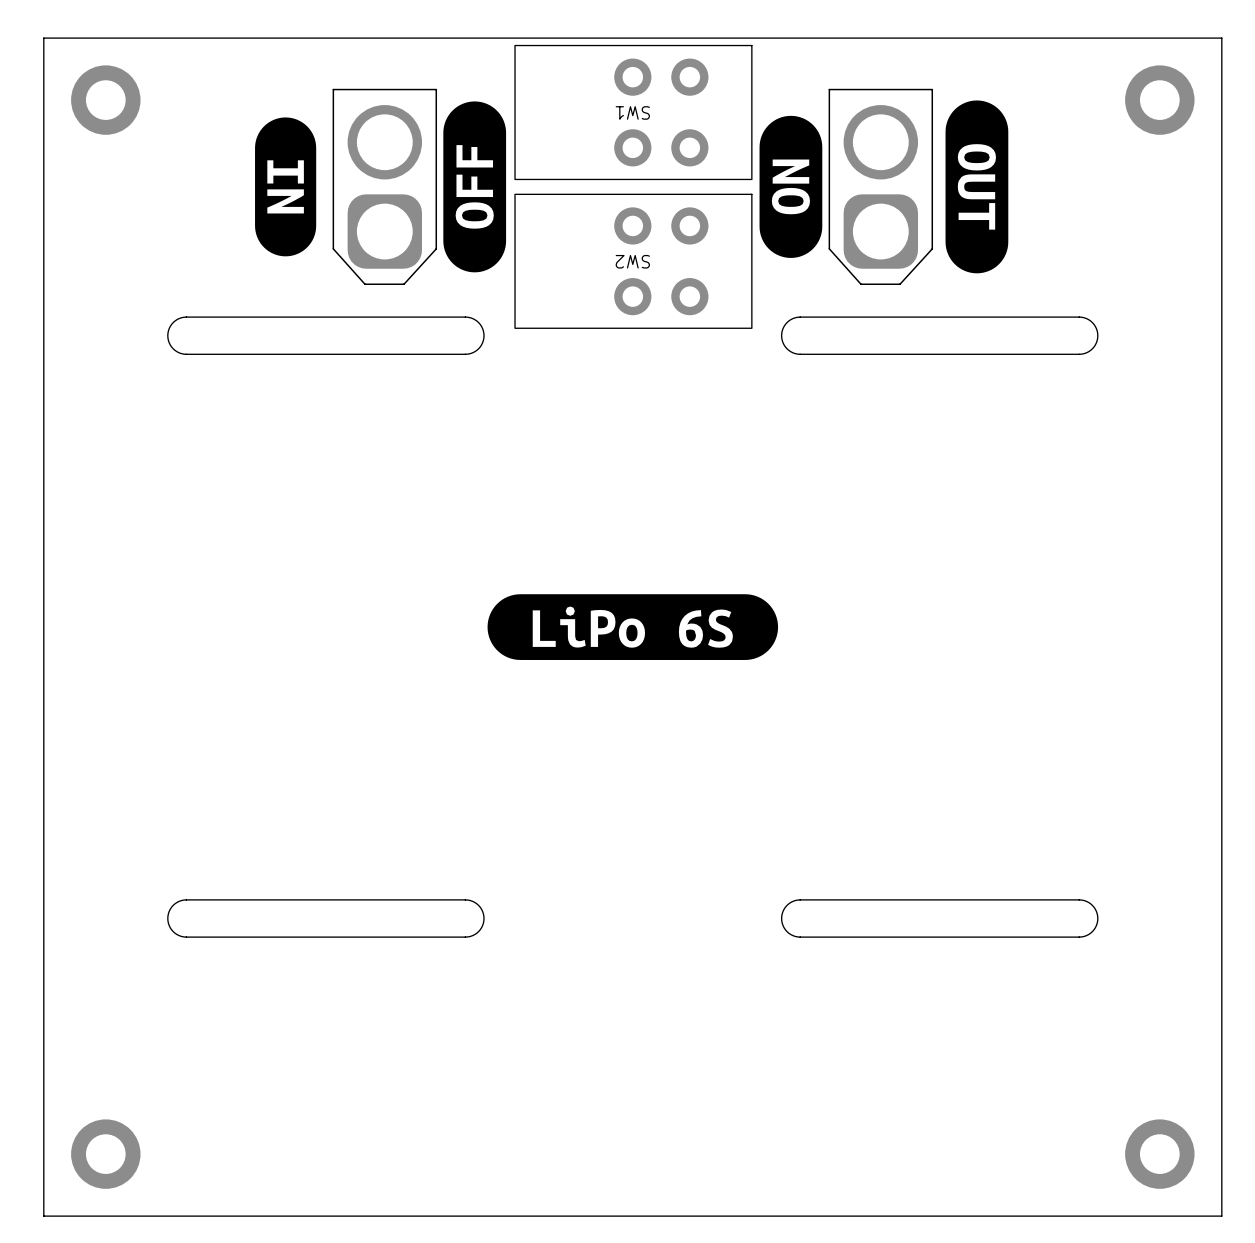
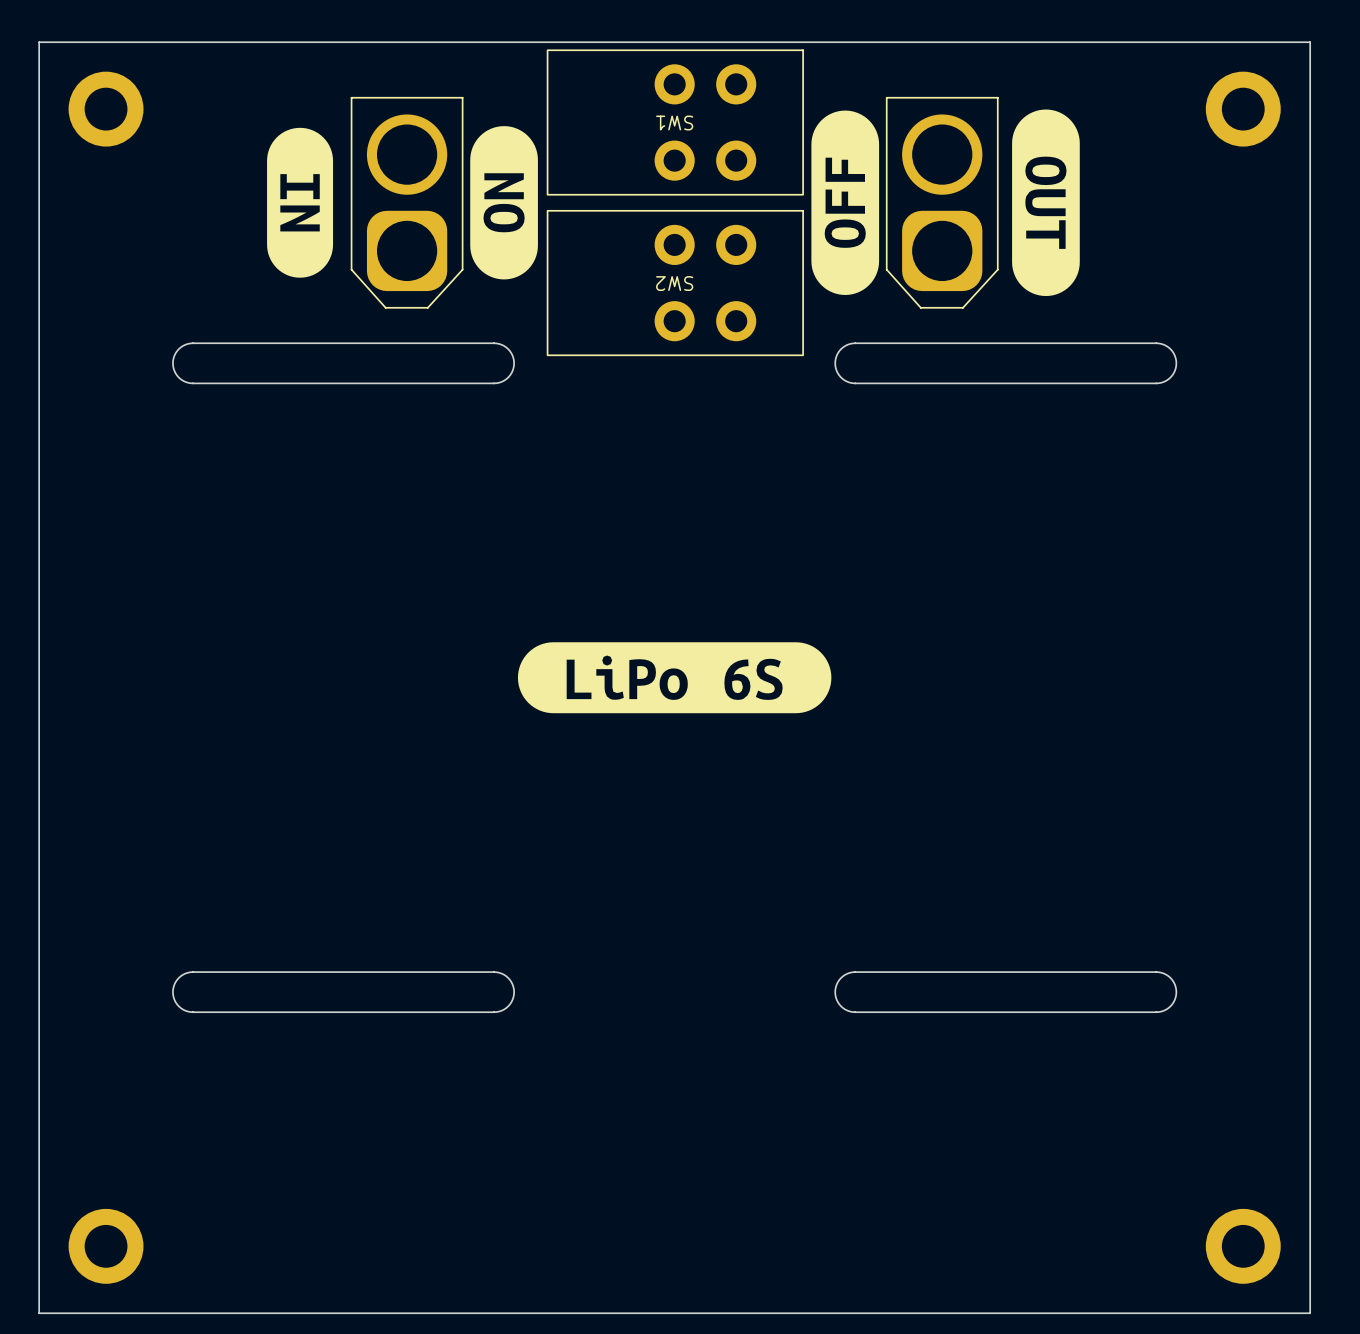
drawing shape: [443, 101, 507, 273] -> [470, 126, 538, 280]
drawing shape: [759, 115, 823, 258] -> [811, 110, 880, 295]

